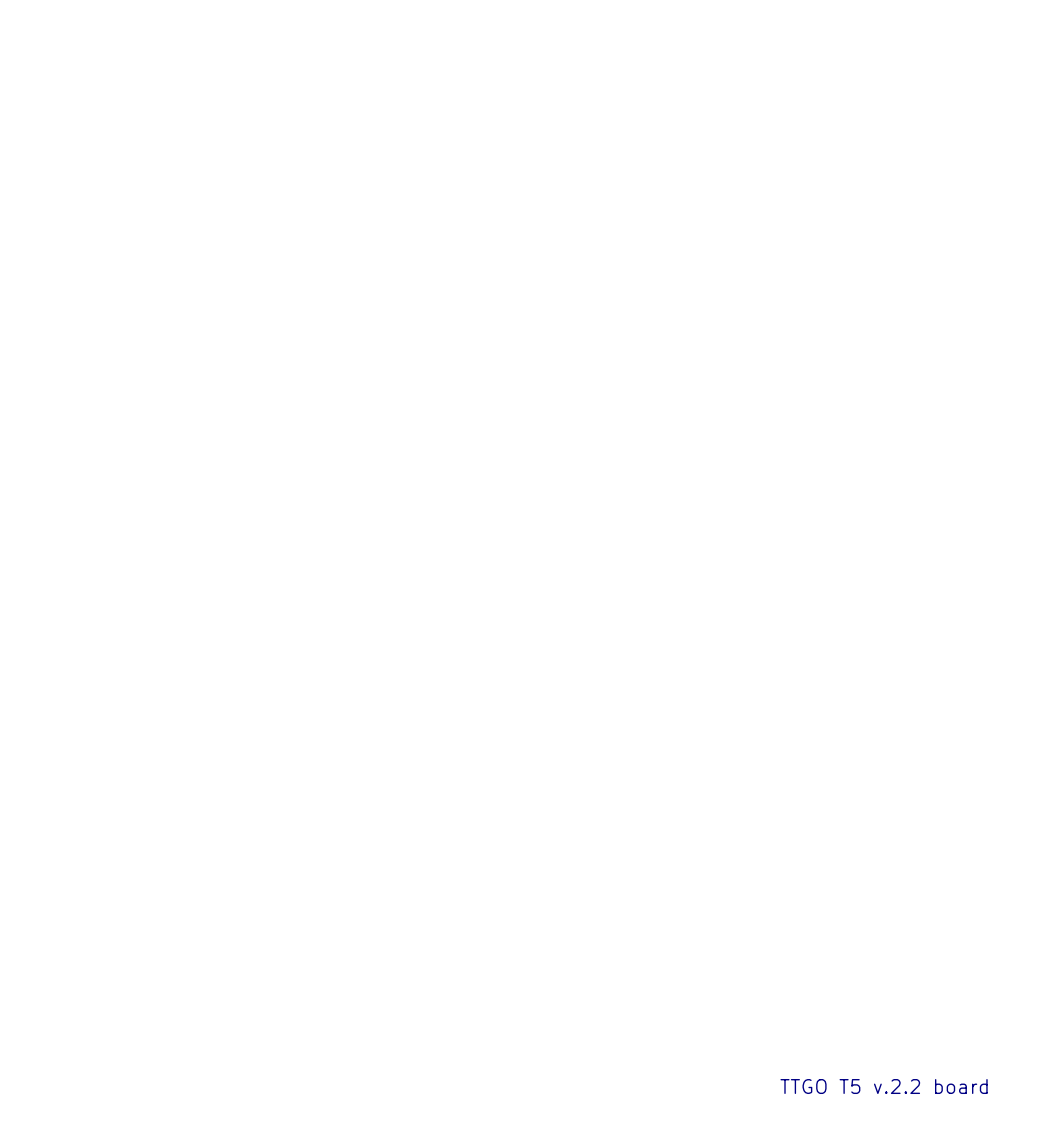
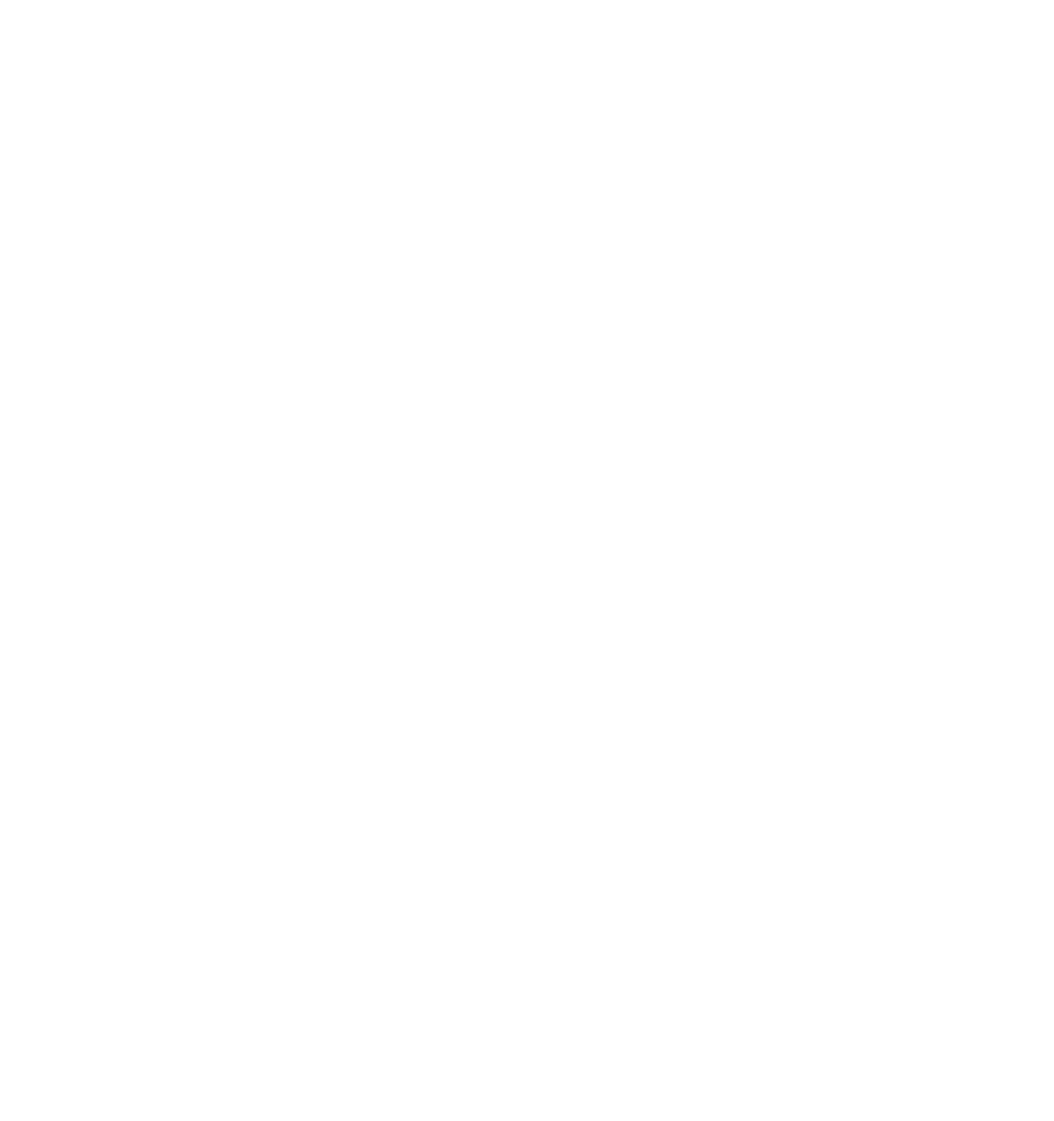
text: TTGO T5 v.2.2 board (884, 1086) -> none

